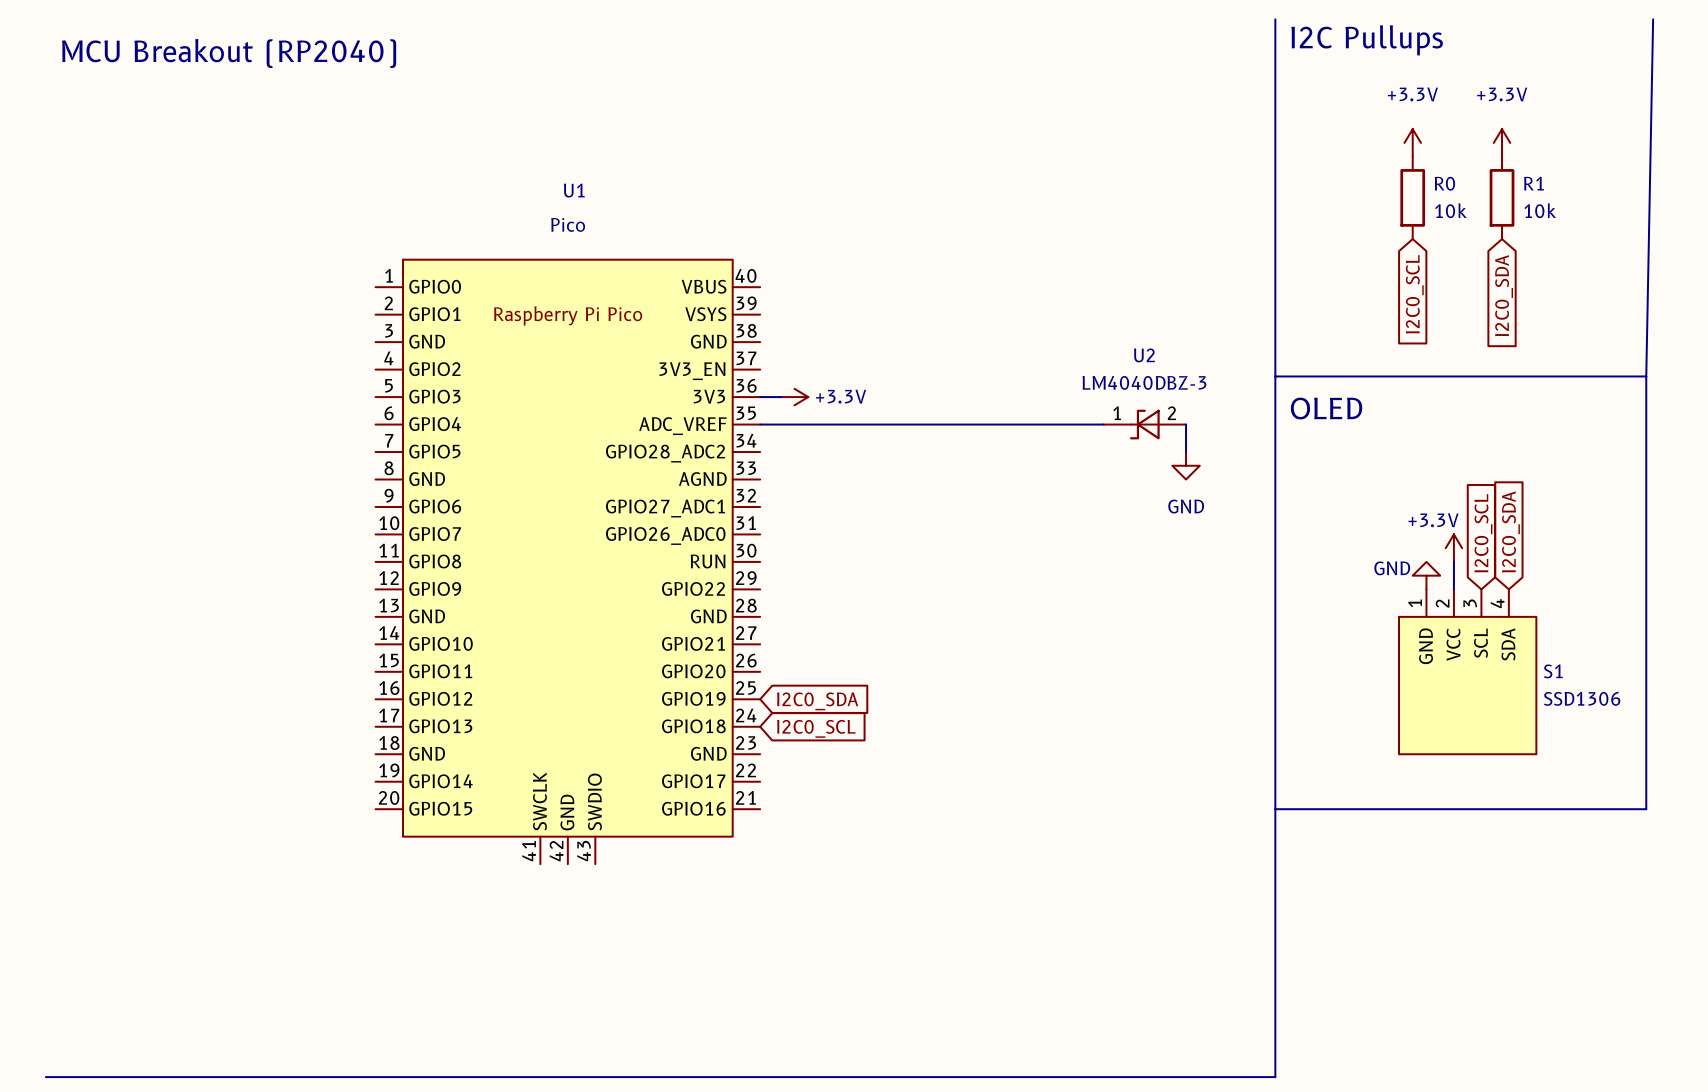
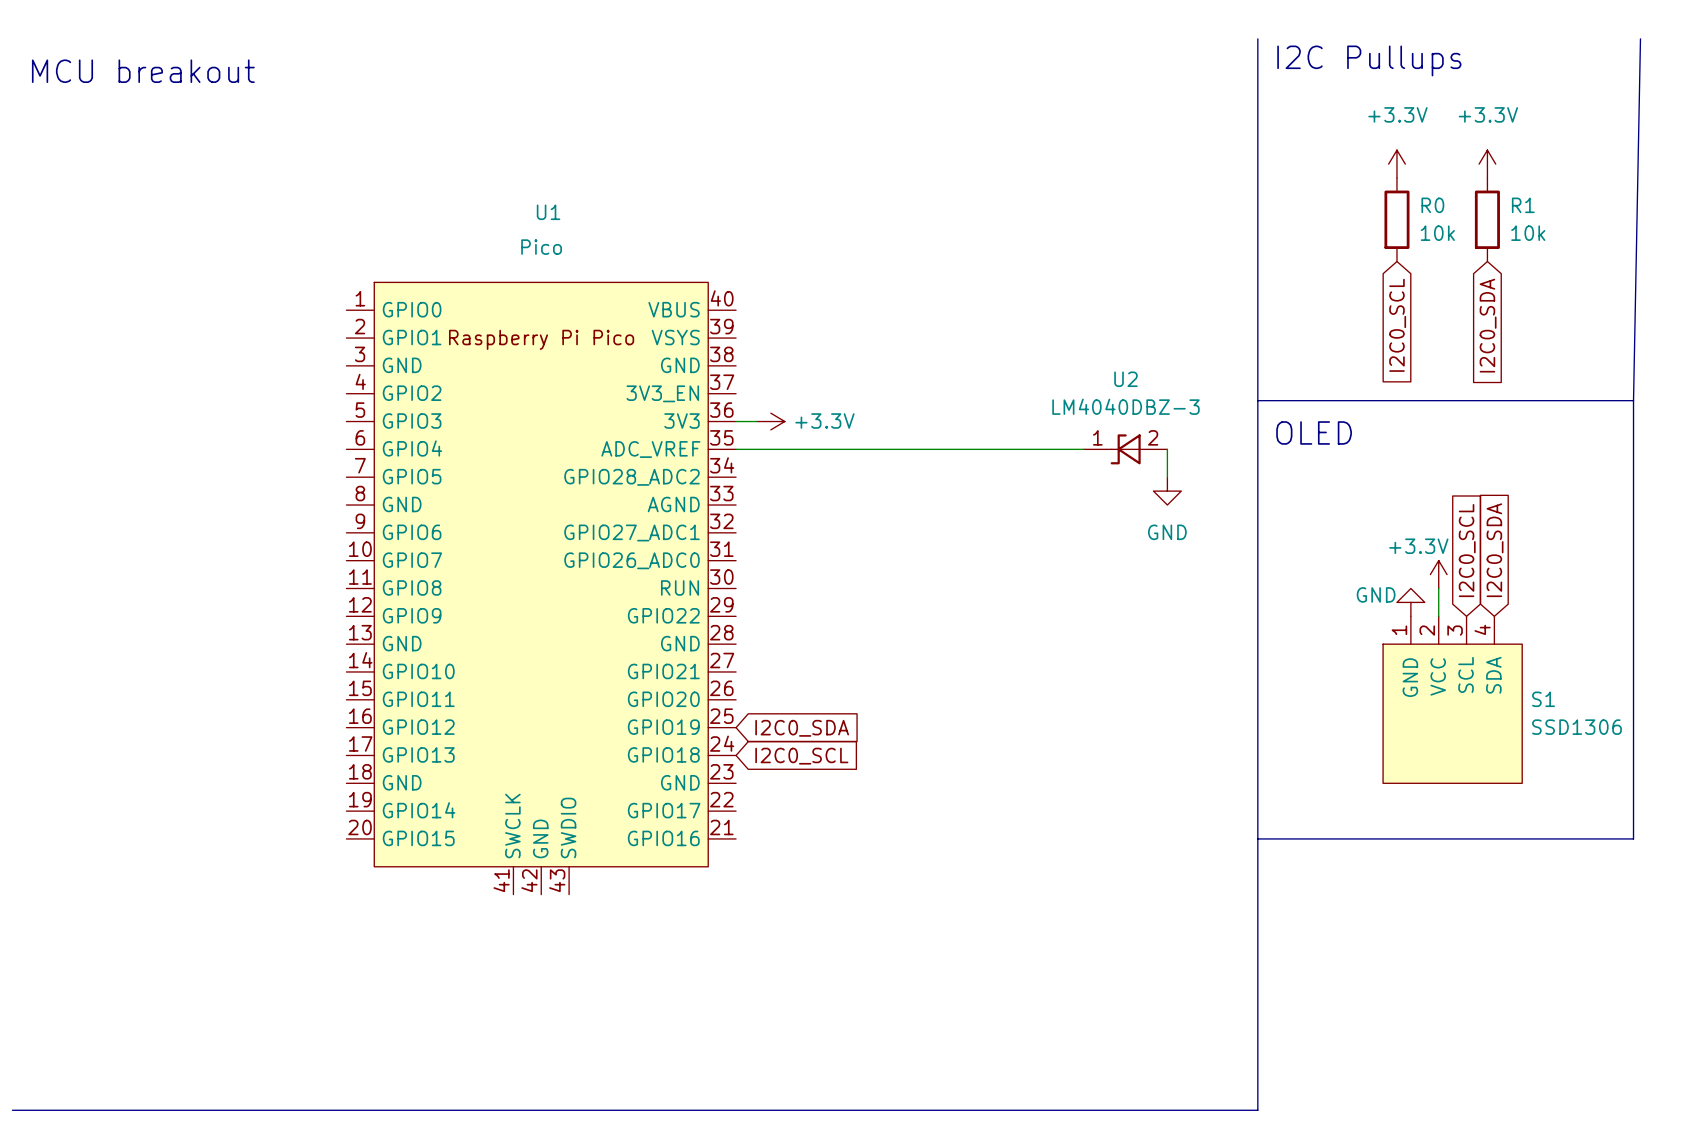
text: MCU Breakout (RP2040) (229, 53) -> MCU breakout (143, 71)

